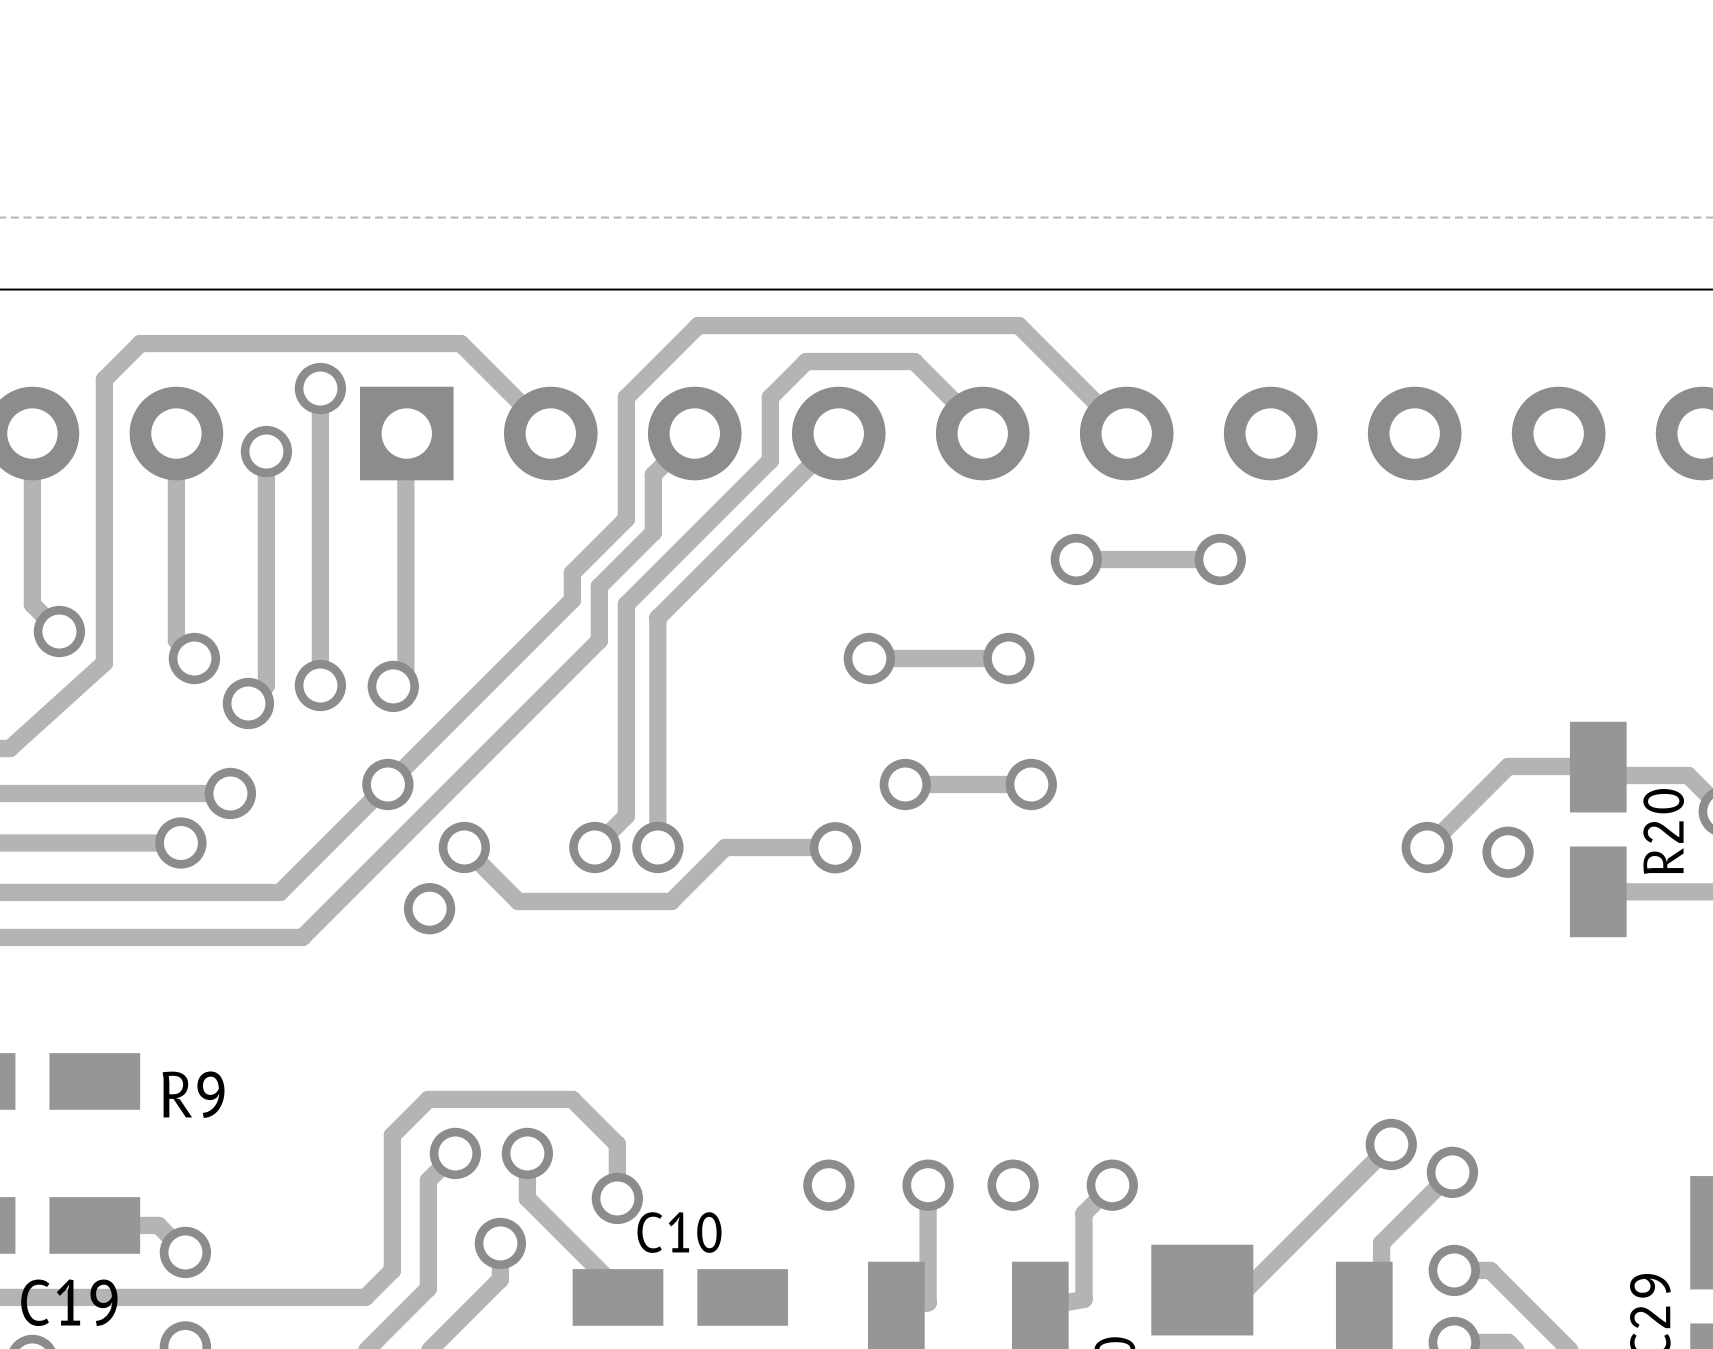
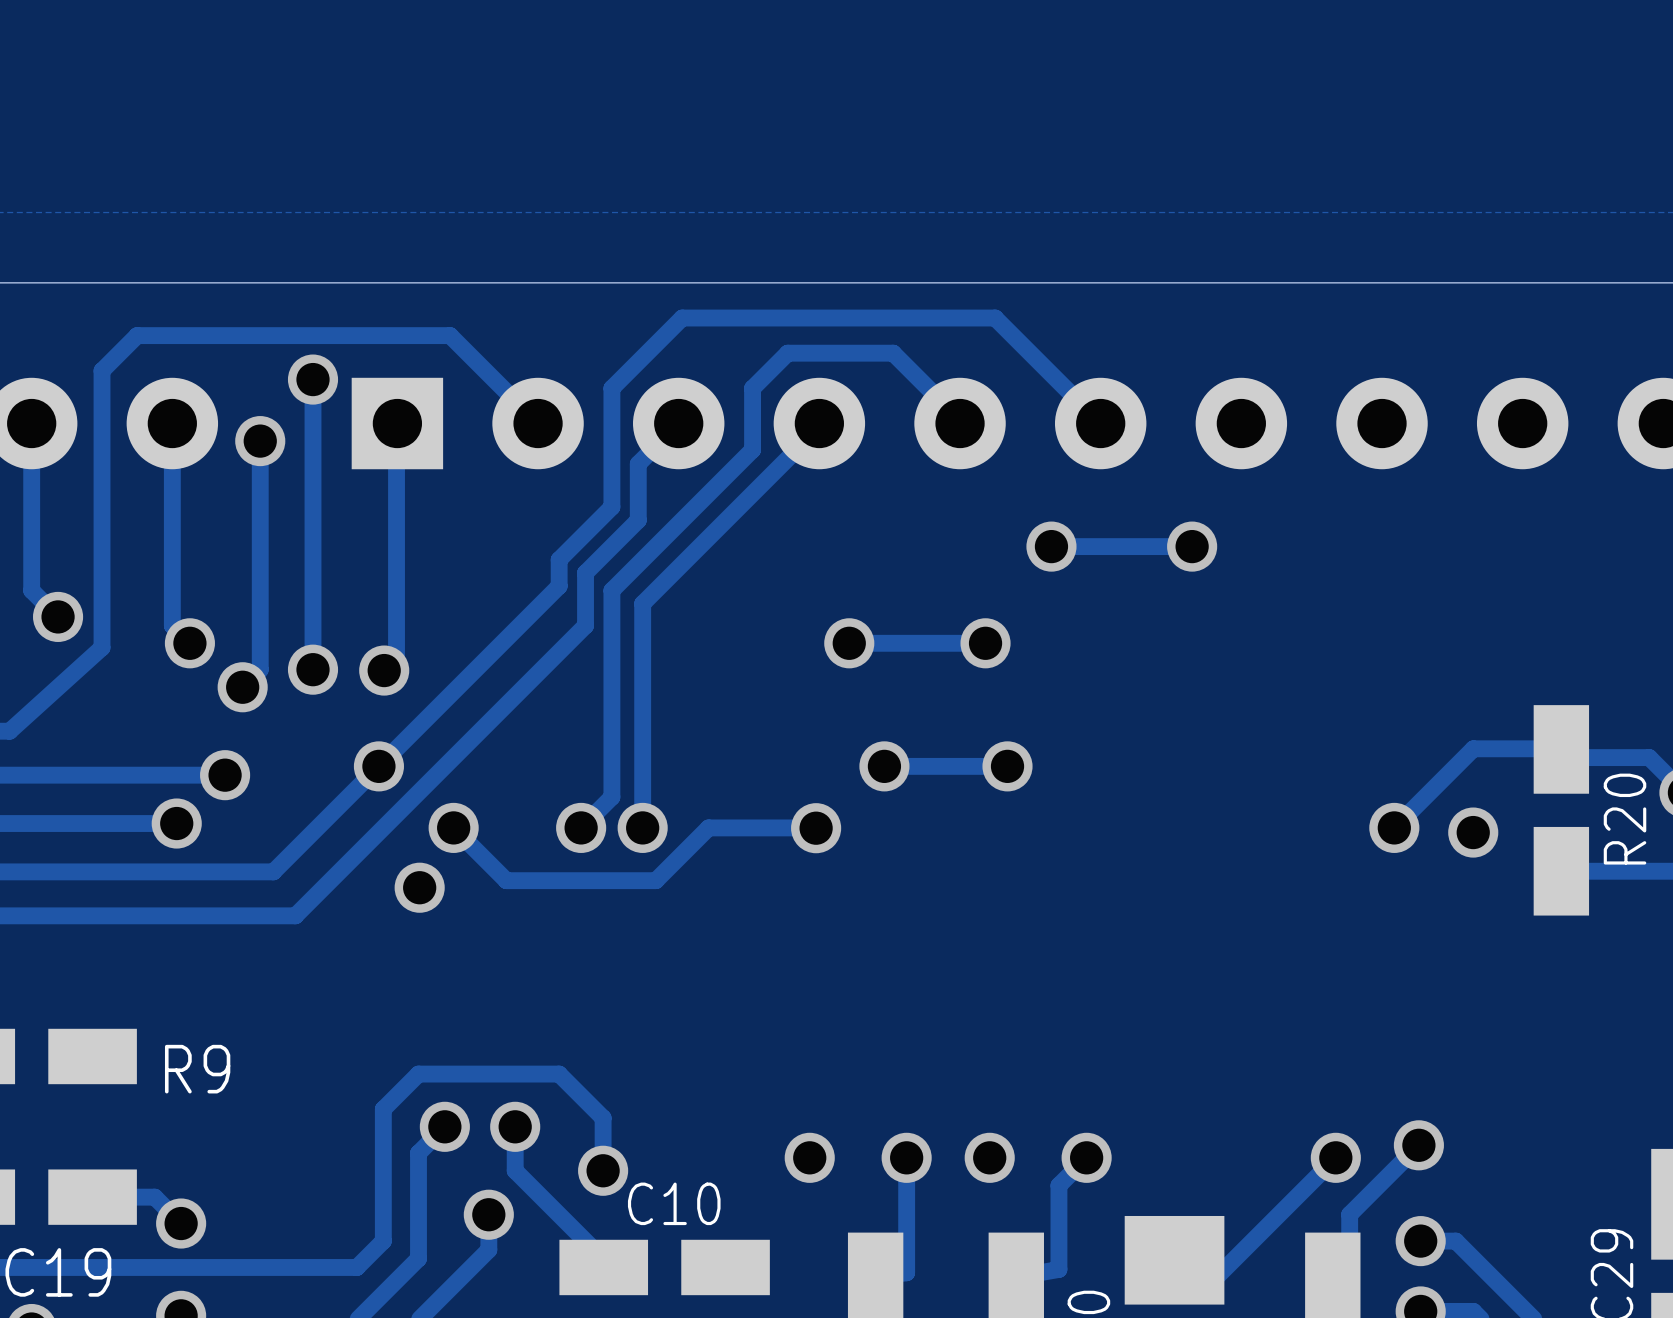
track: (1391, 1144) (1245, 1290) (1202, 1290) -> (1335, 1157) (1216, 1276) (1174, 1260)
via position: (1391, 1144) -> (1335, 1157)

